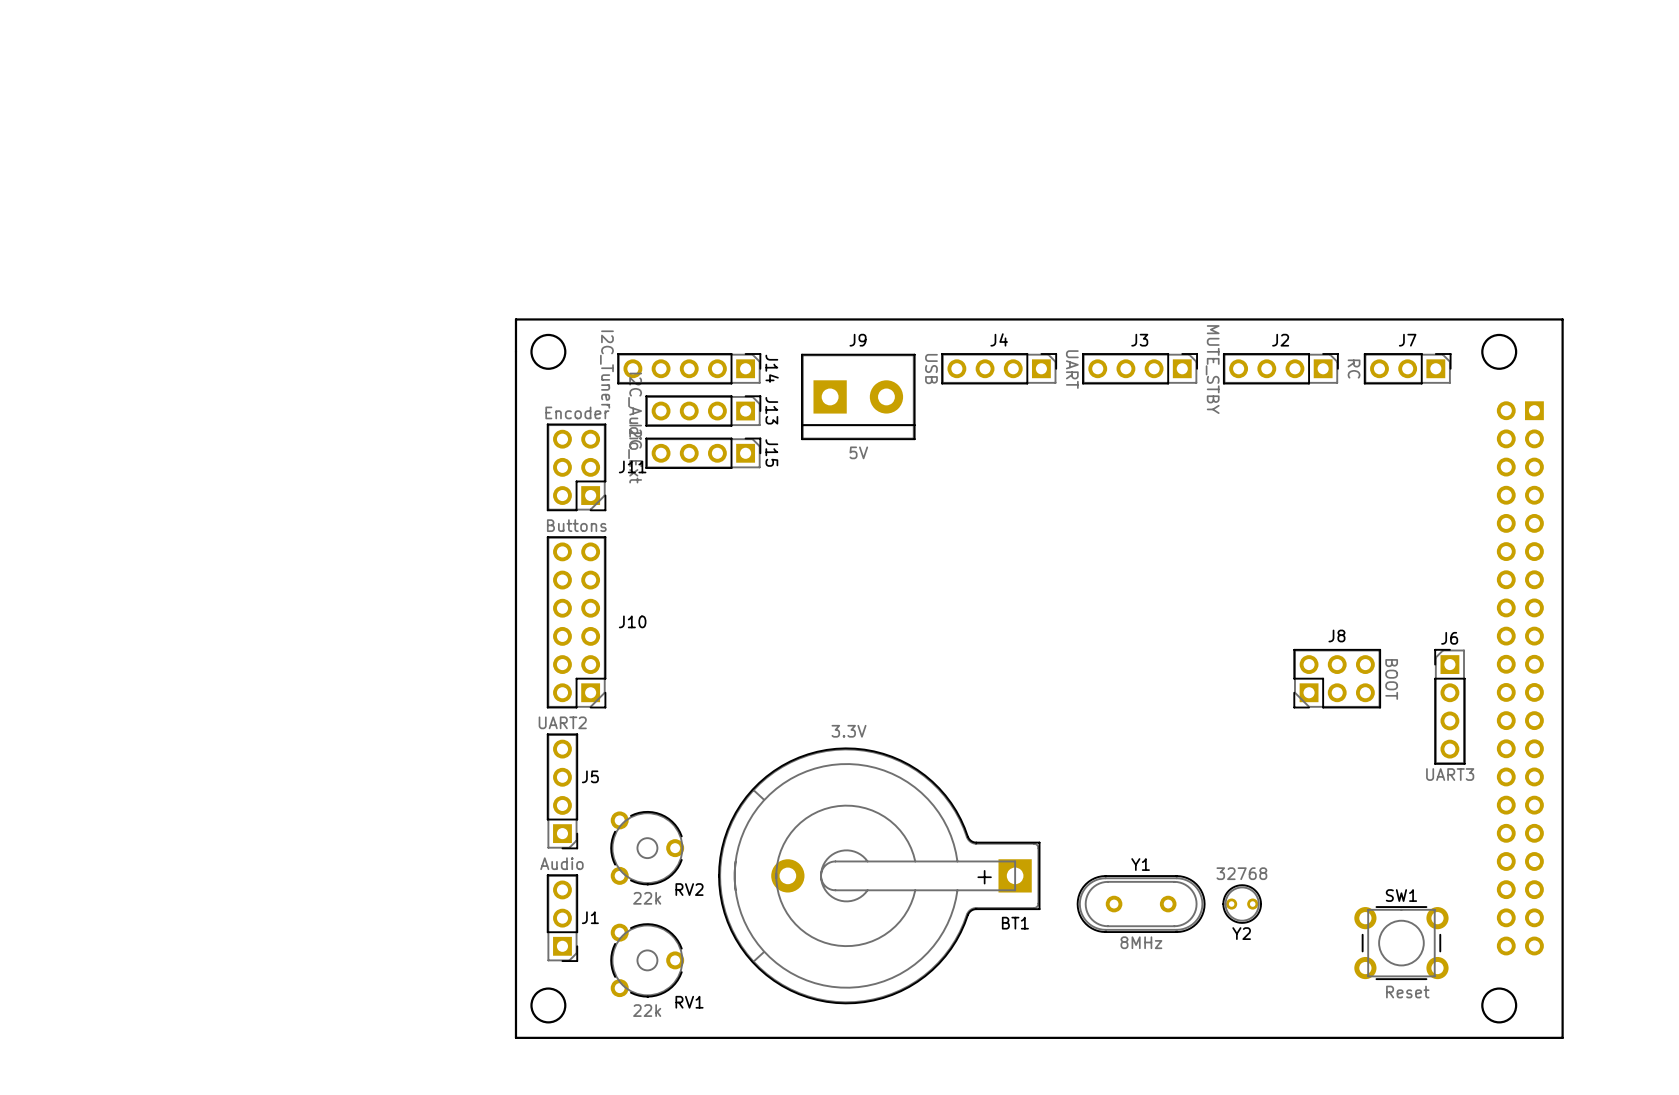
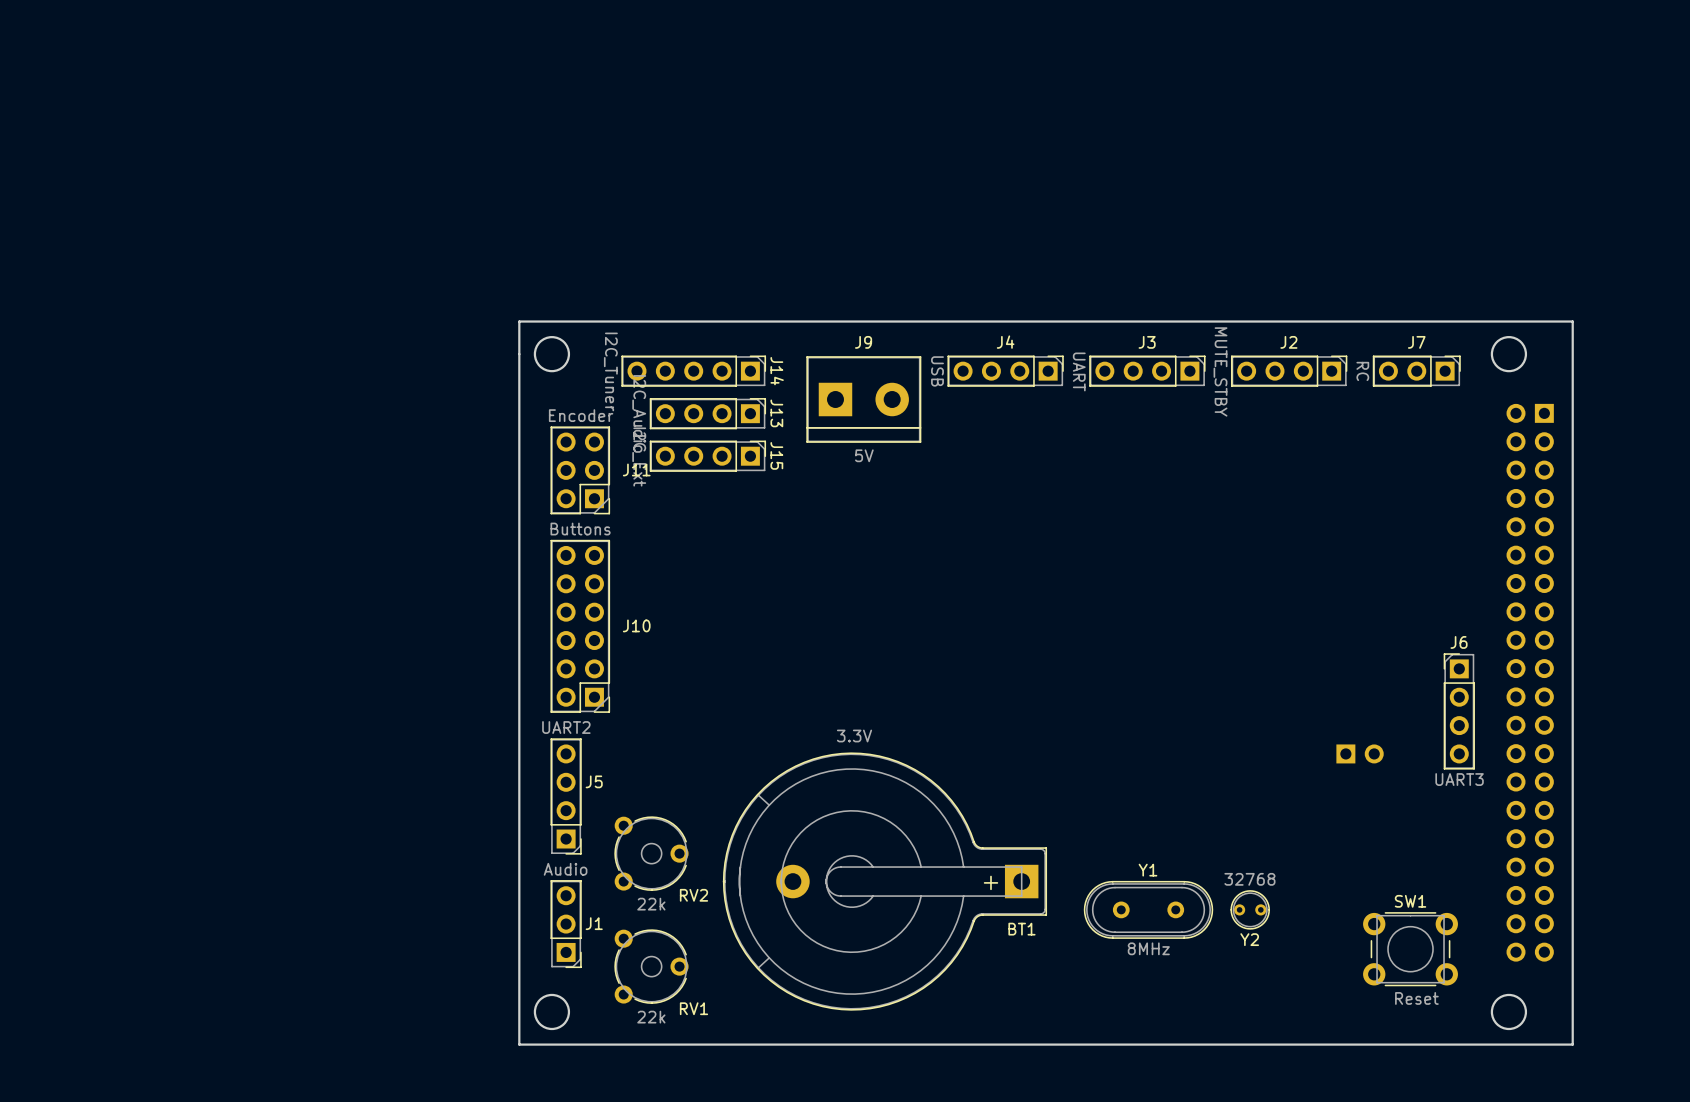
J8: BOOT (1337, 678) -> none
part: none -> (1360, 753)

